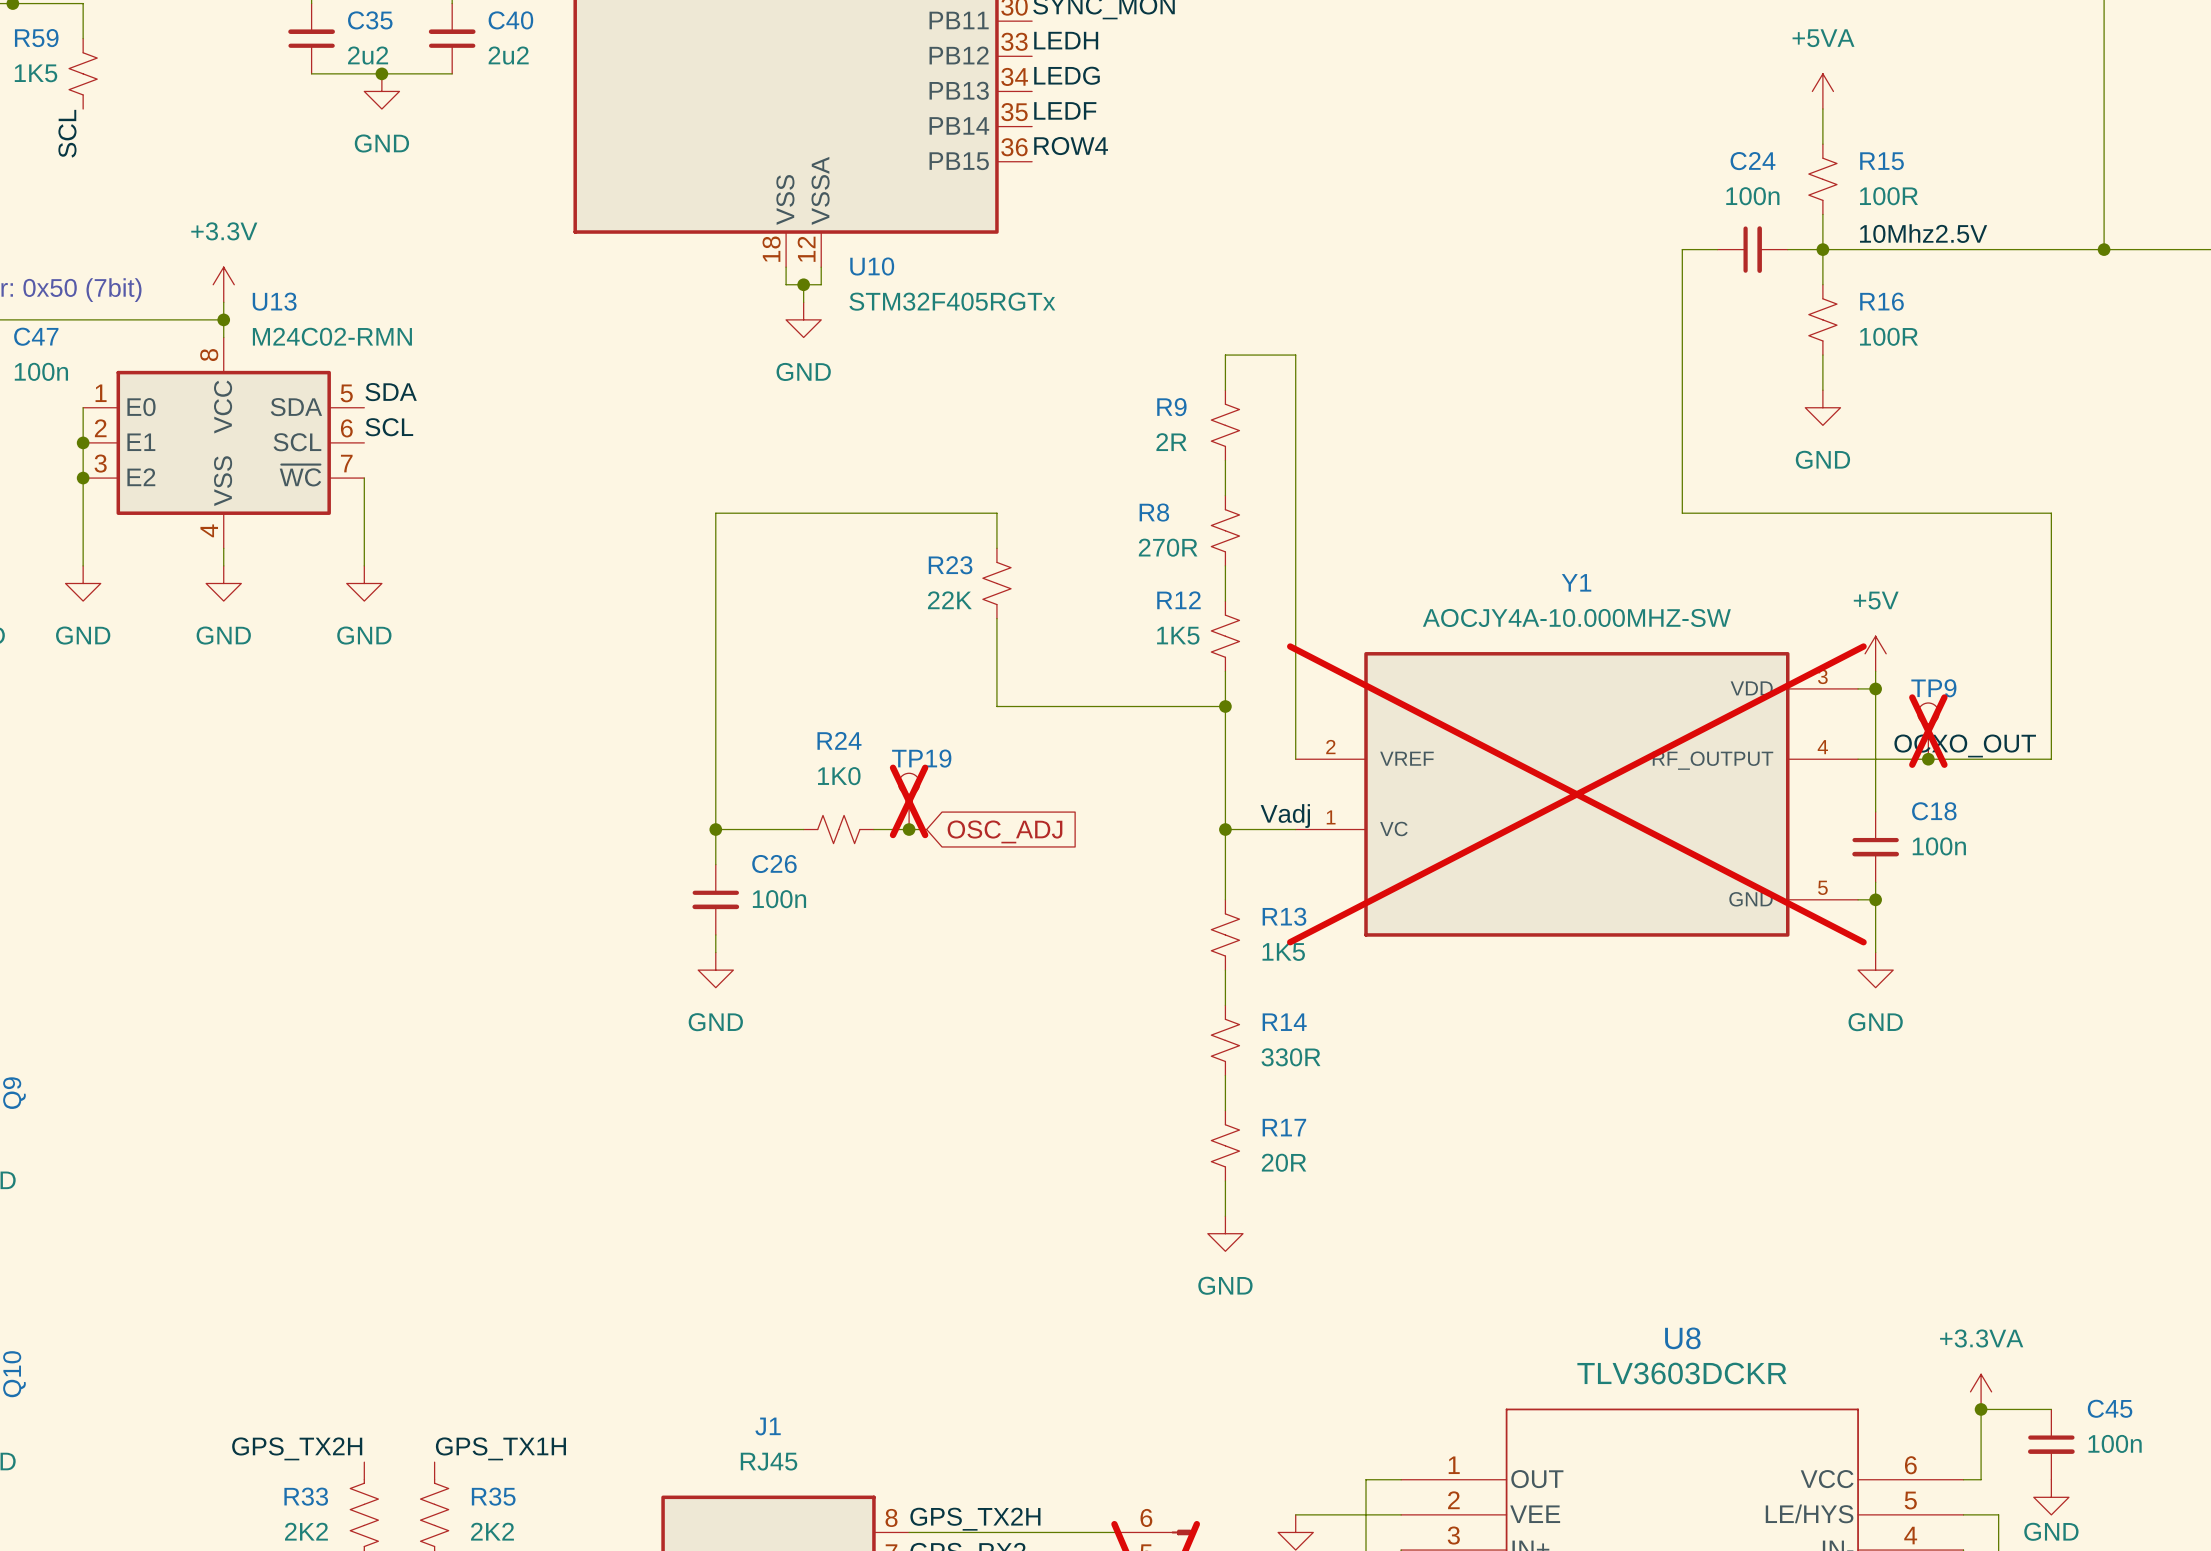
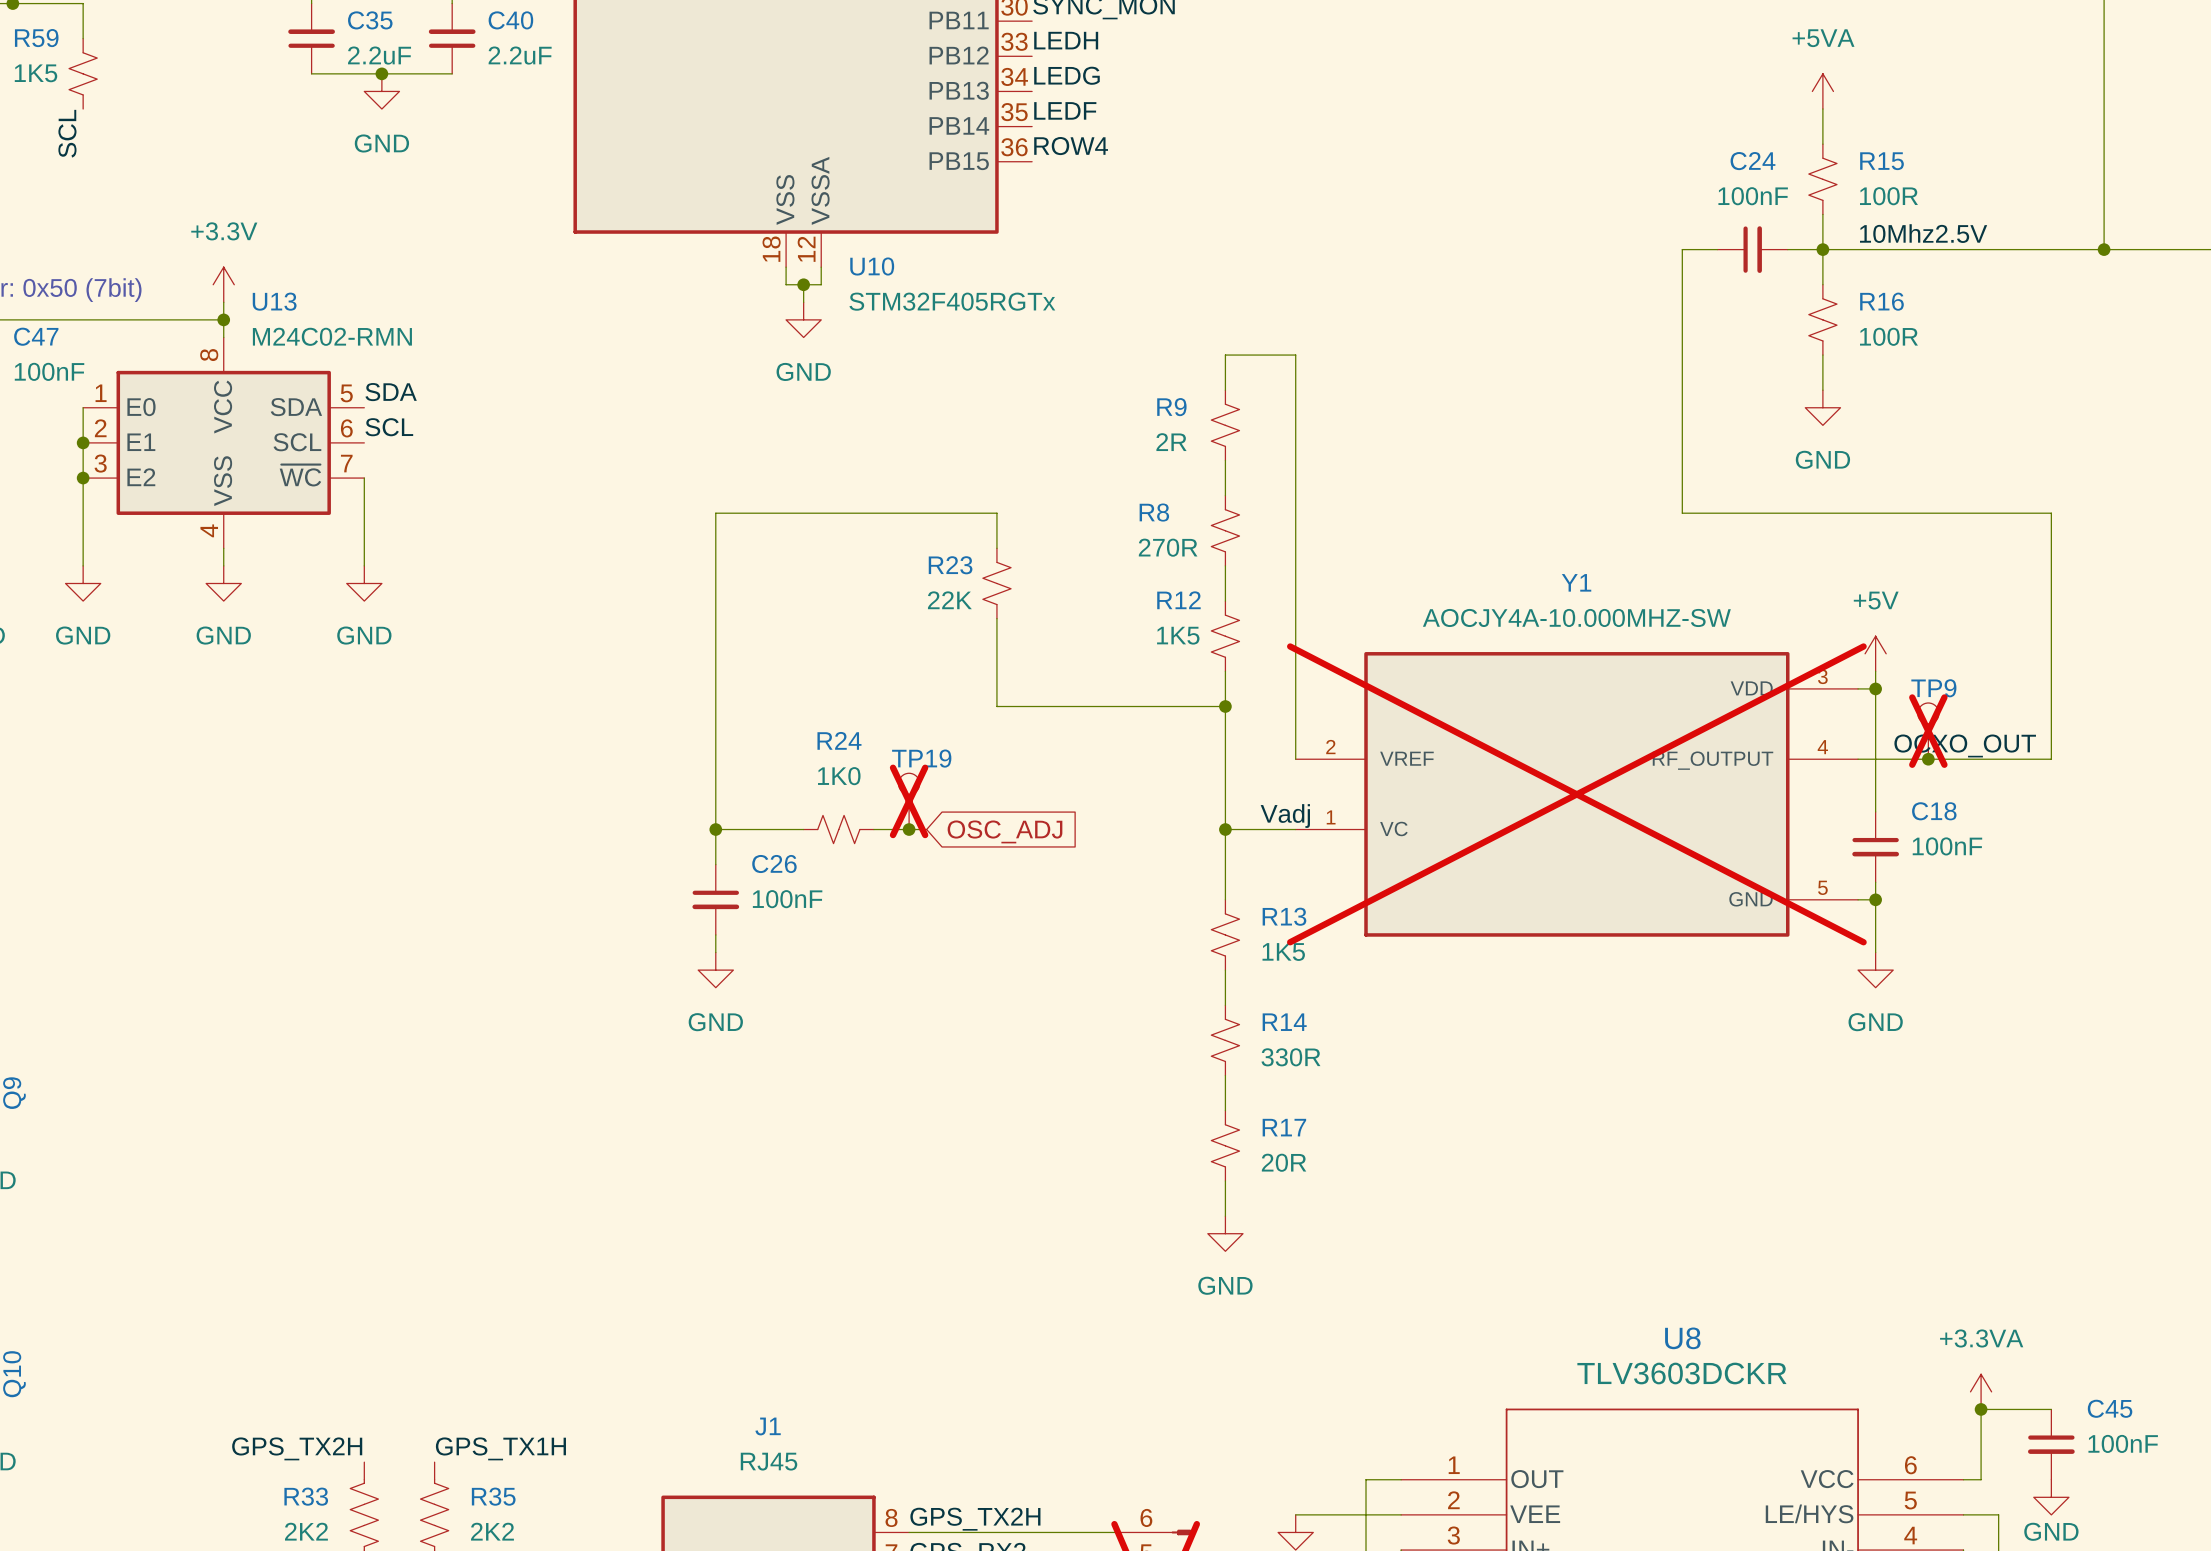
C35 value: 2u2 (368, 55) -> 2.2uF (379, 55)
C40 value: 2u2 (508, 55) -> 2.2uF (520, 55)
C24 value: 100n (1752, 196) -> 100nF (1753, 196)
C47 value: 100n (41, 371) -> 100nF (49, 371)
C18 value: 100n (1939, 846) -> 100nF (1947, 846)
C26 value: 100n (779, 899) -> 100nF (787, 899)
C45 value: 100n (2115, 1443) -> 100nF (2123, 1443)

